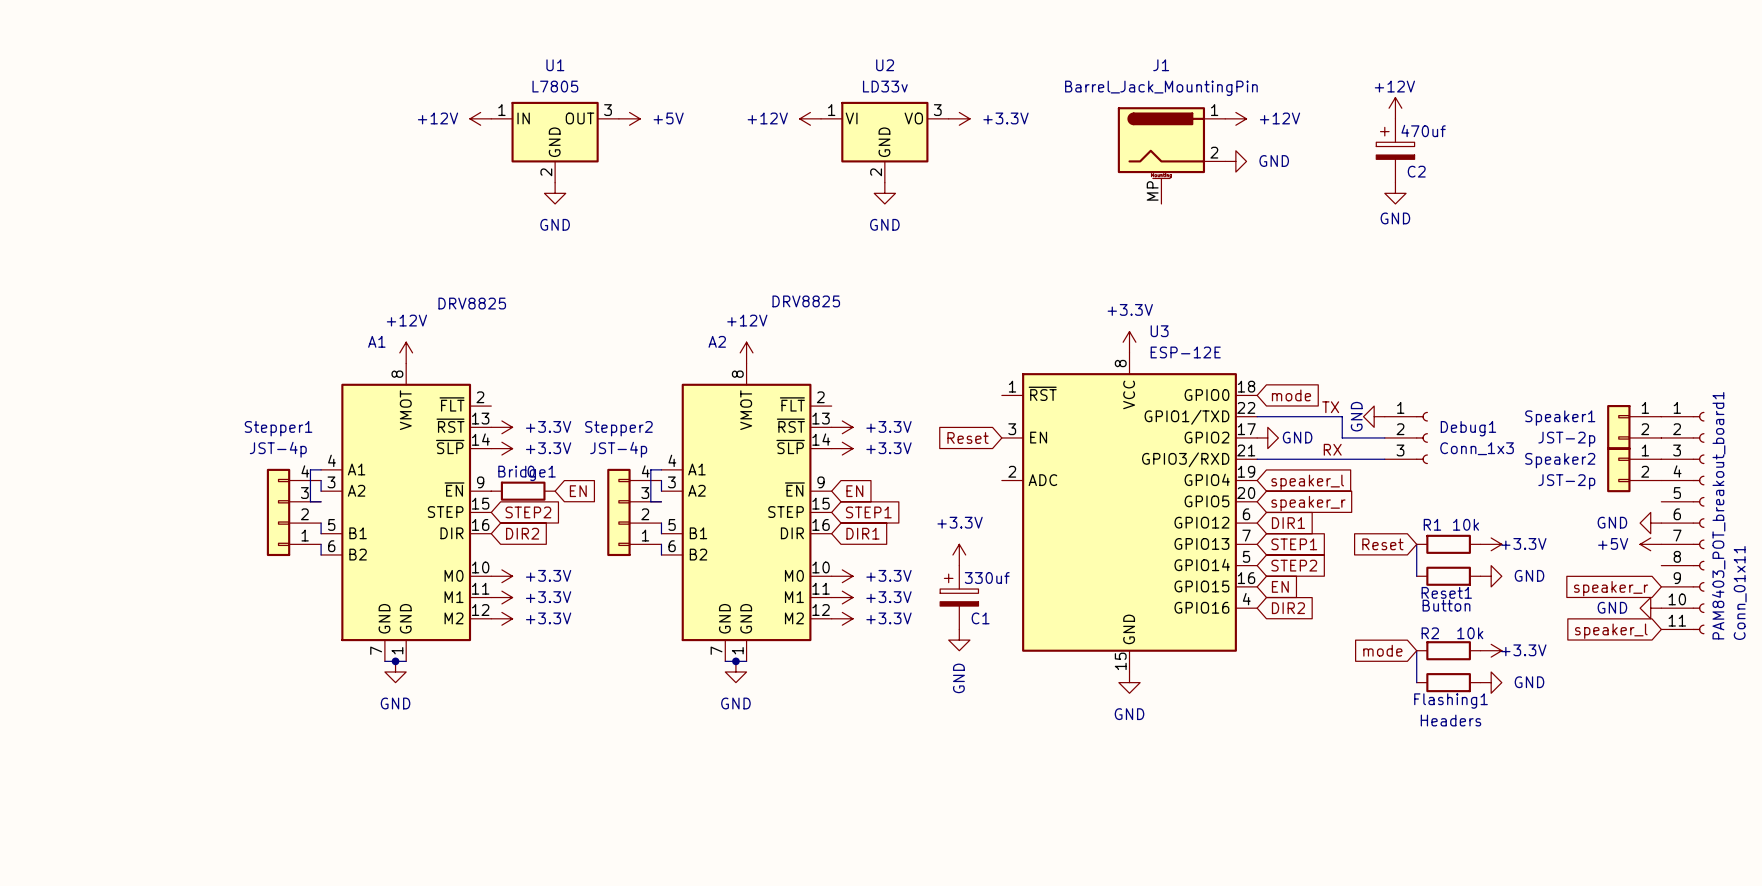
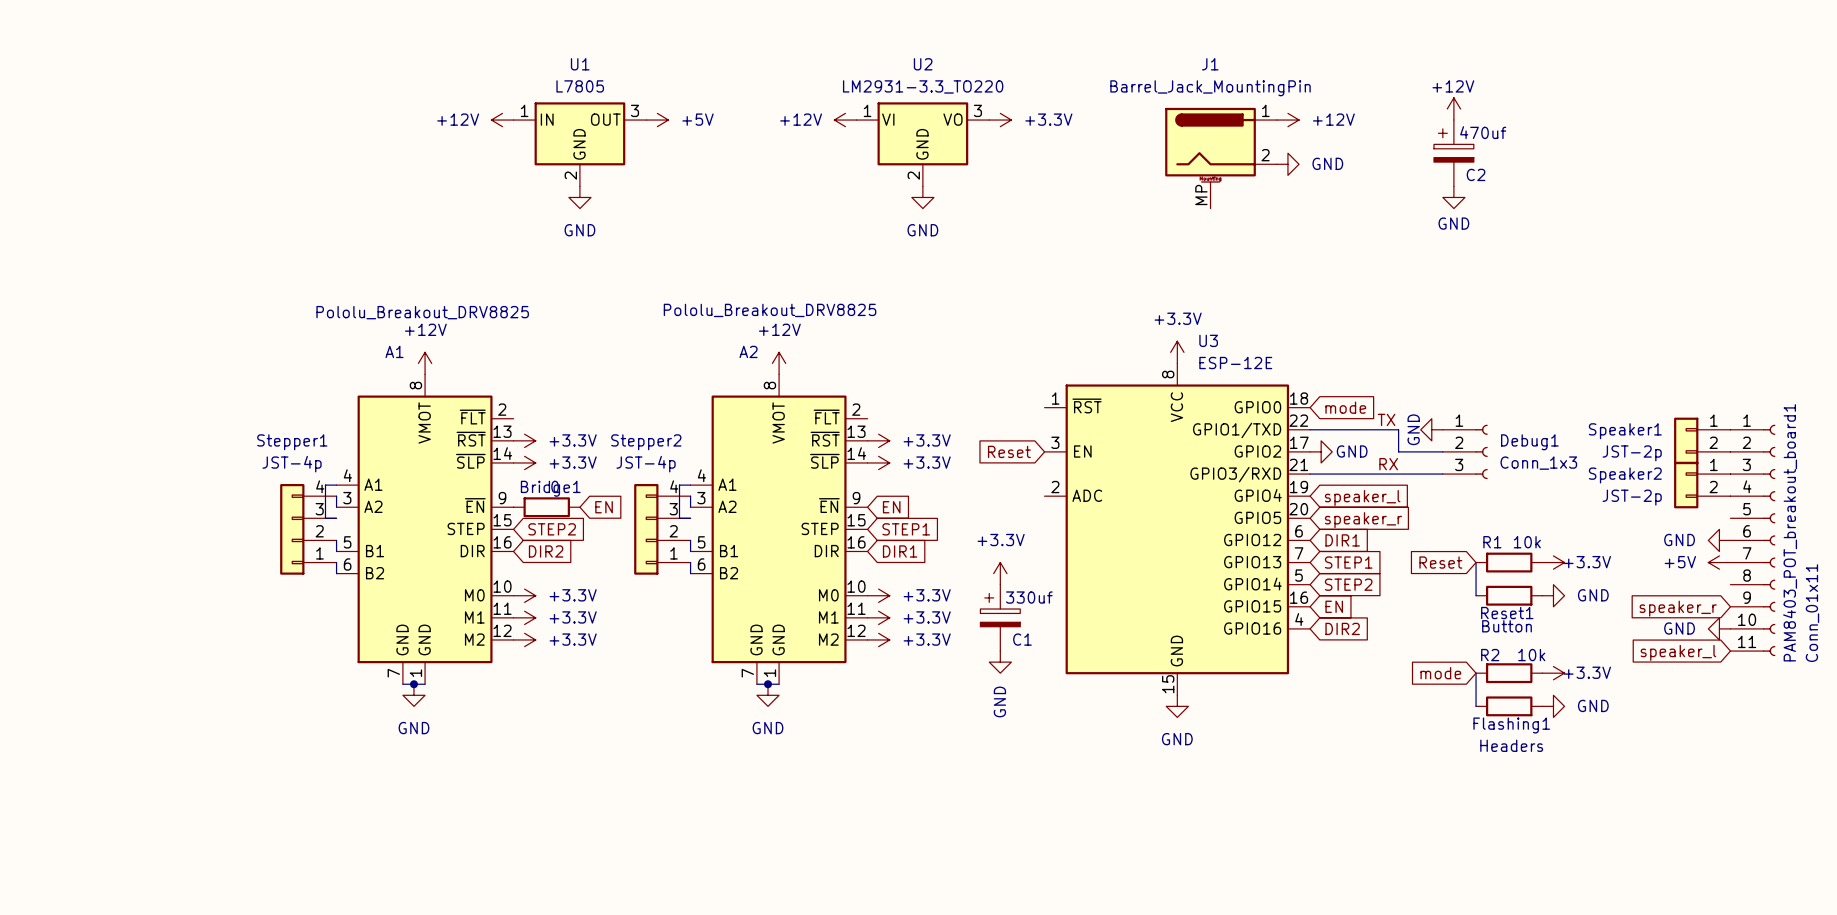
U2 value: LD33v (885, 86) -> LM2931-3.3_TO220 (923, 86)
A2 value: DRV8825 (806, 301) -> Pololu_Breakout_DRV8825 (770, 310)
A1 value: DRV8825 (472, 303) -> Pololu_Breakout_DRV8825 (422, 312)

